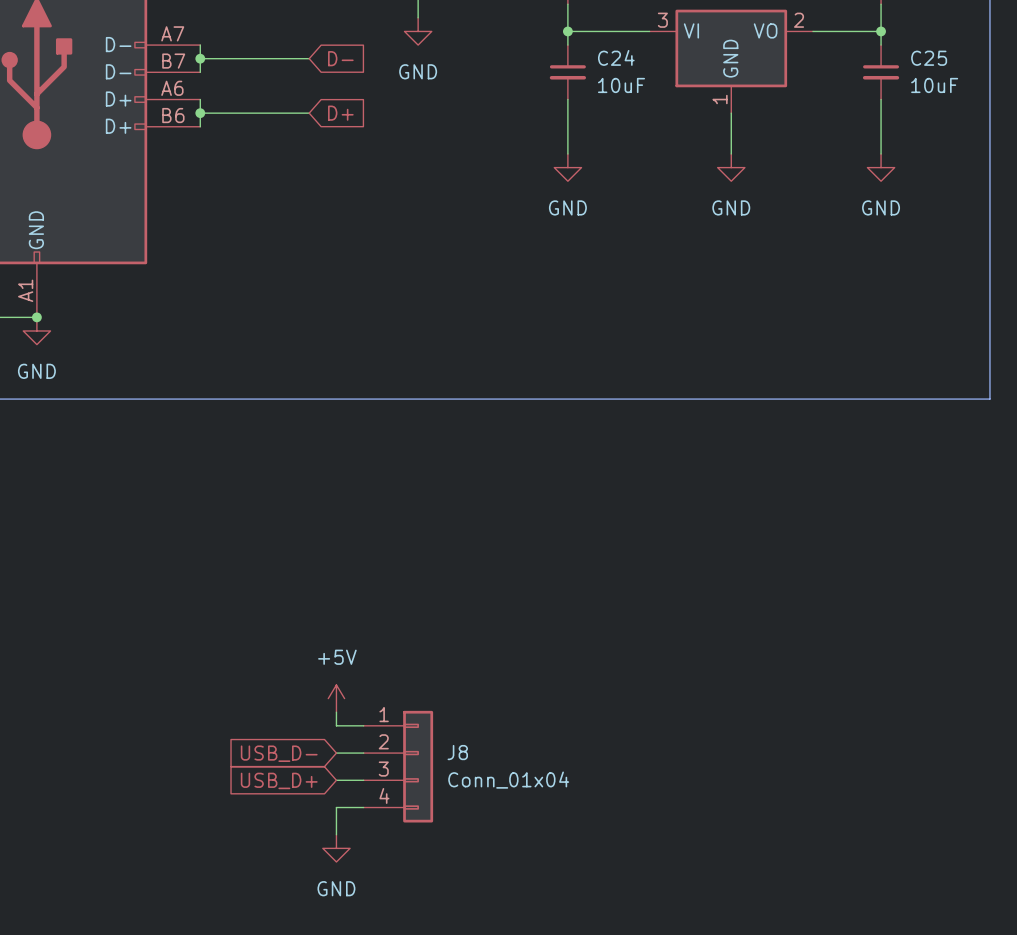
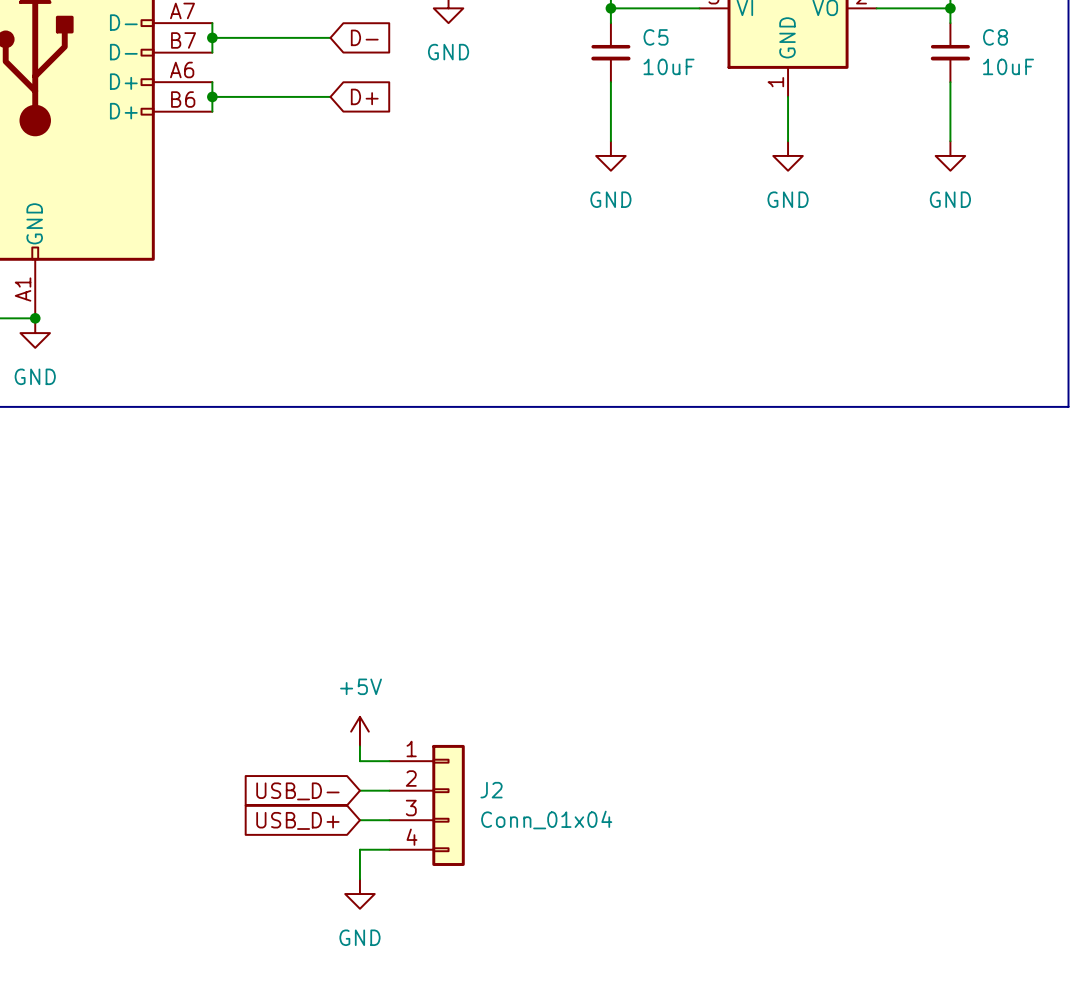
C24 name: C24 (616, 57) -> C5 (656, 37)
C25 name: C25 (929, 58) -> C8 (995, 37)
J8 name: J8 (457, 752) -> J2 (491, 790)

